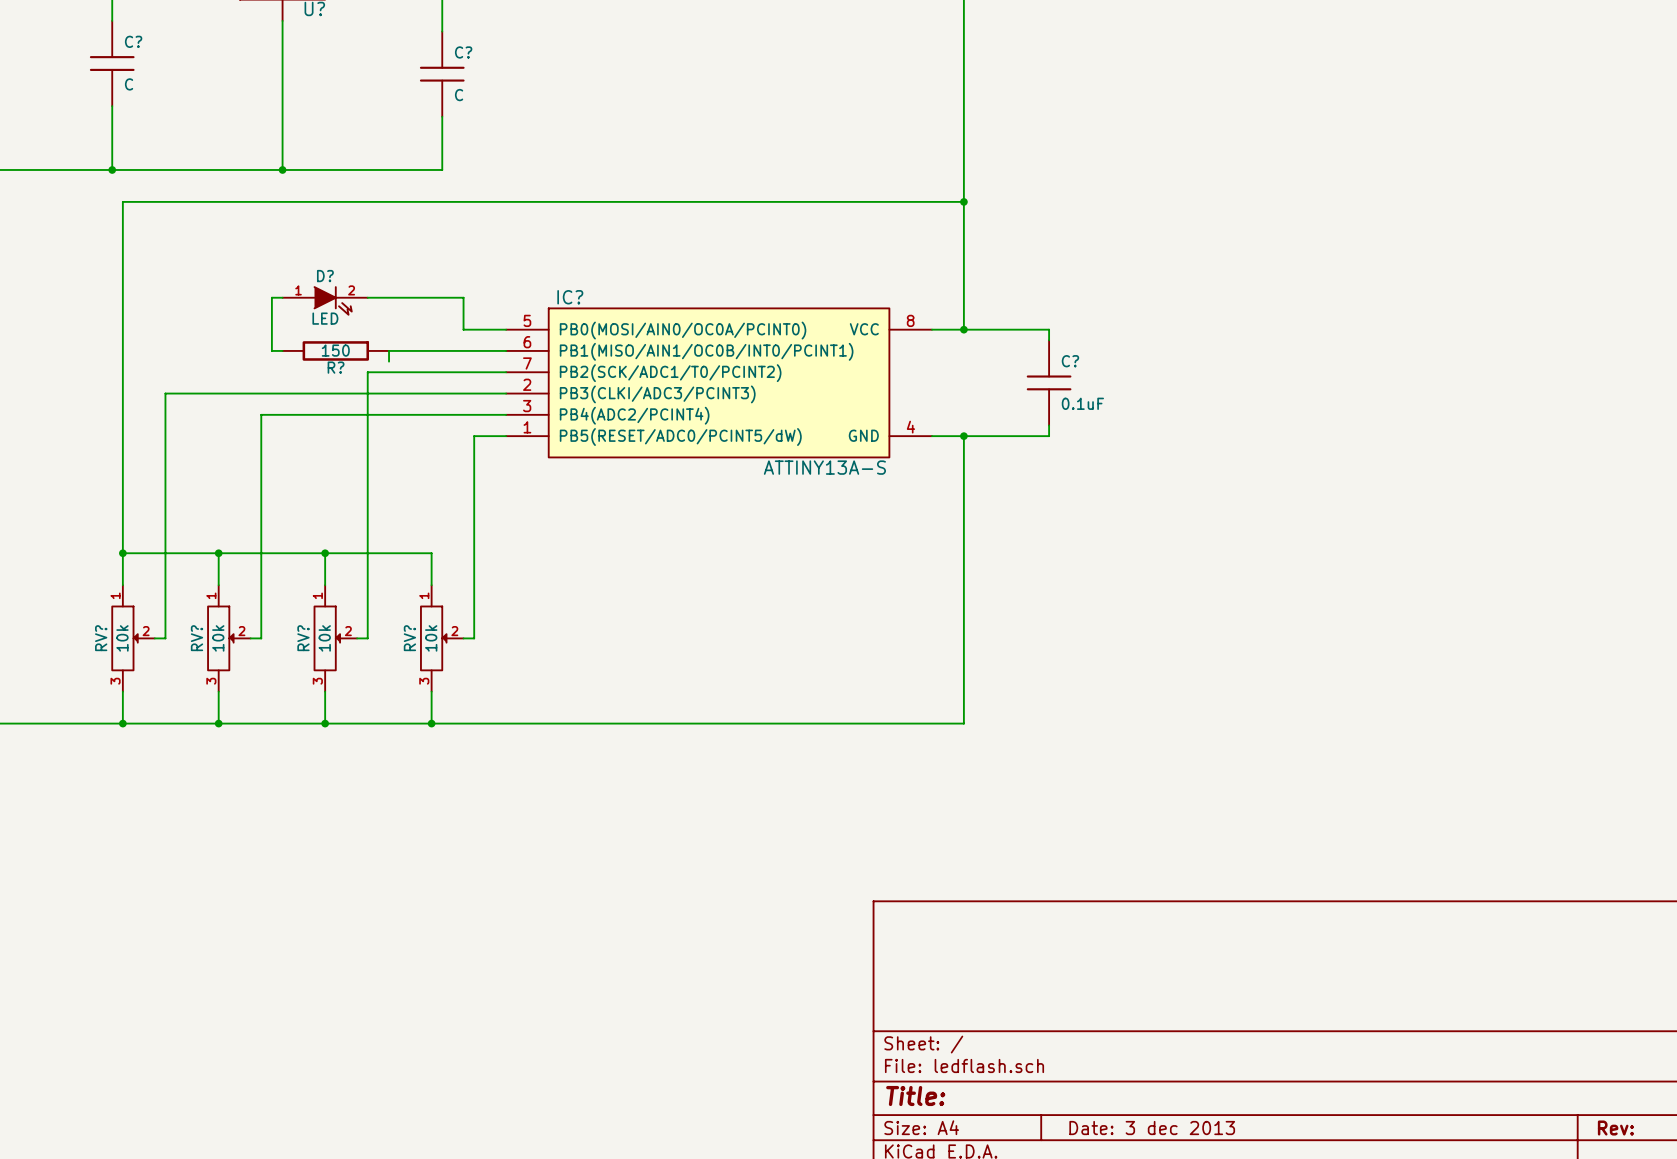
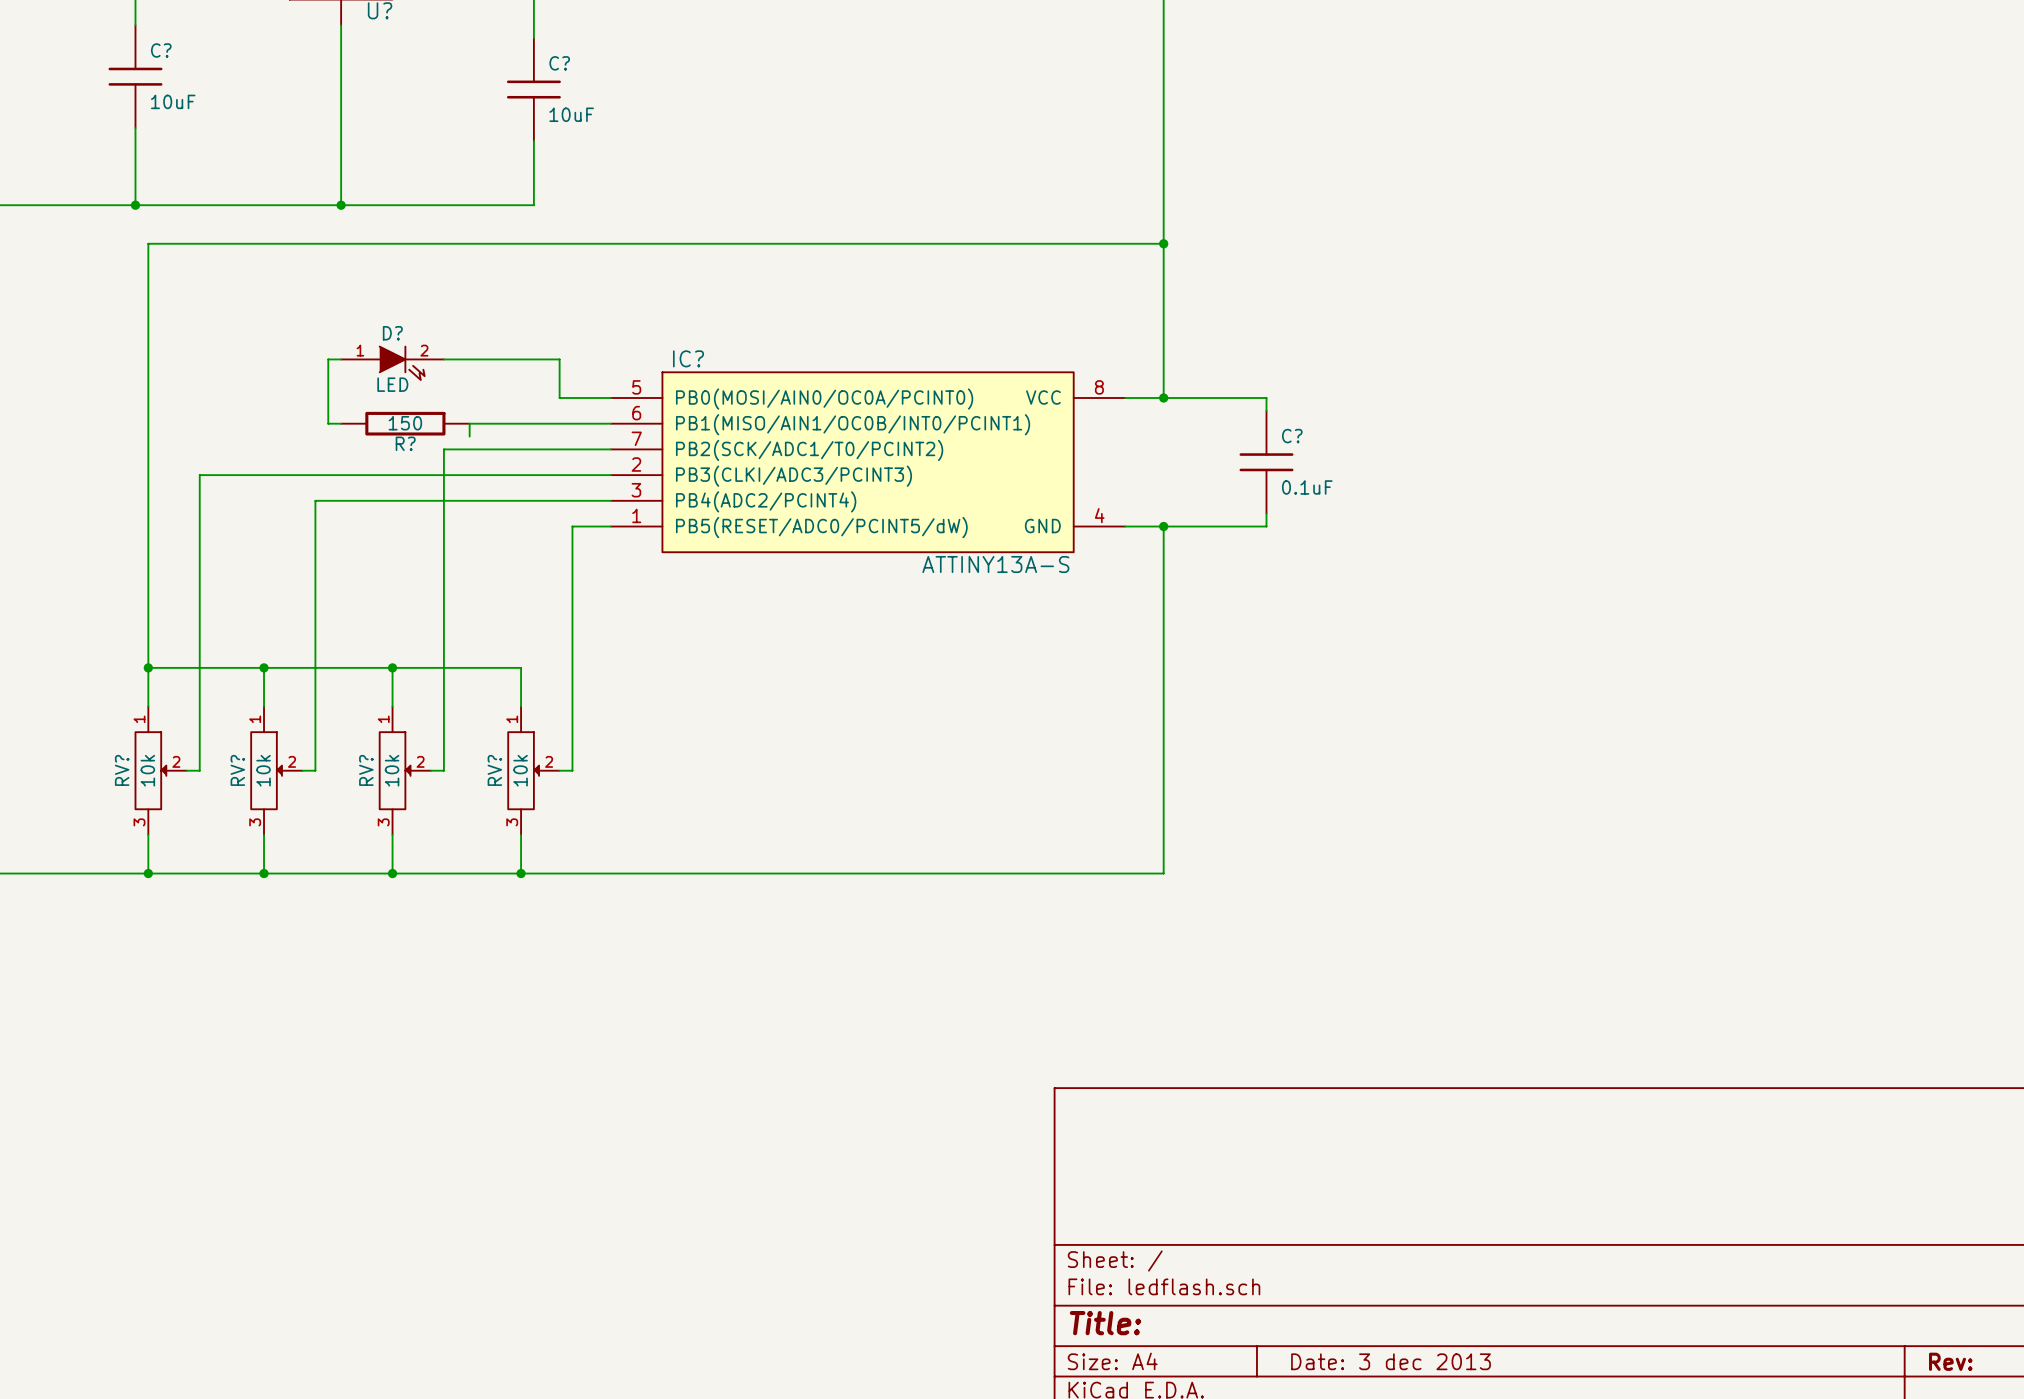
C? value: C (129, 84) -> 10uF (173, 101)
C? value: C (459, 95) -> 10uF (571, 114)

